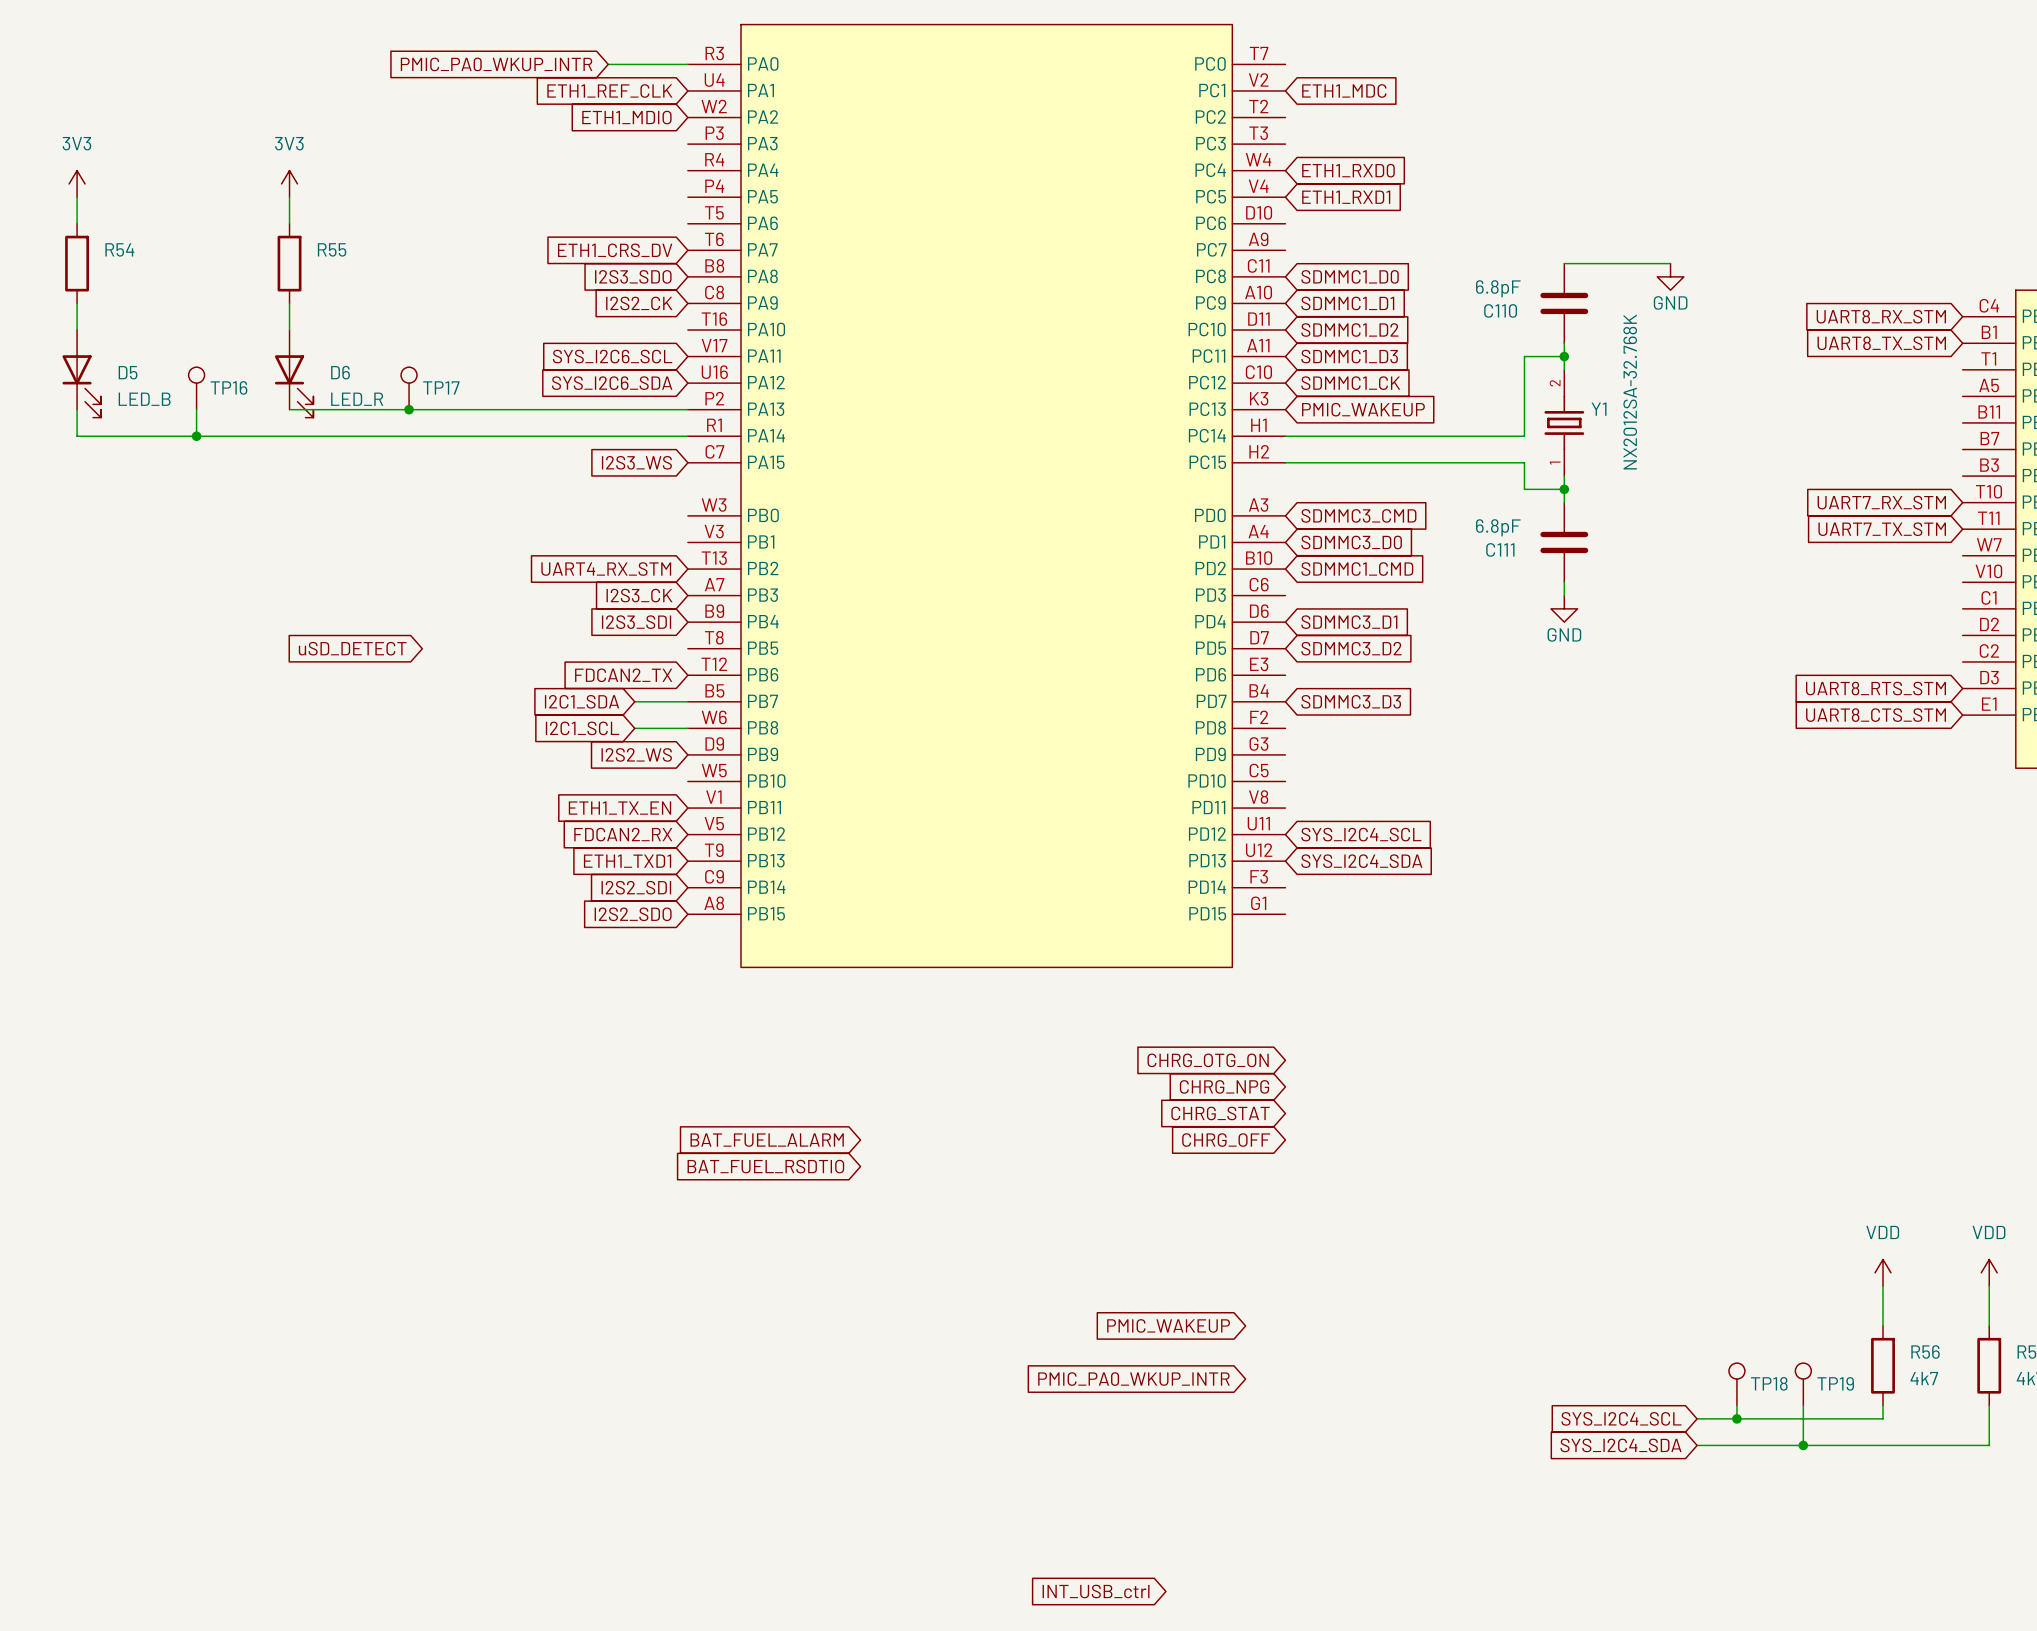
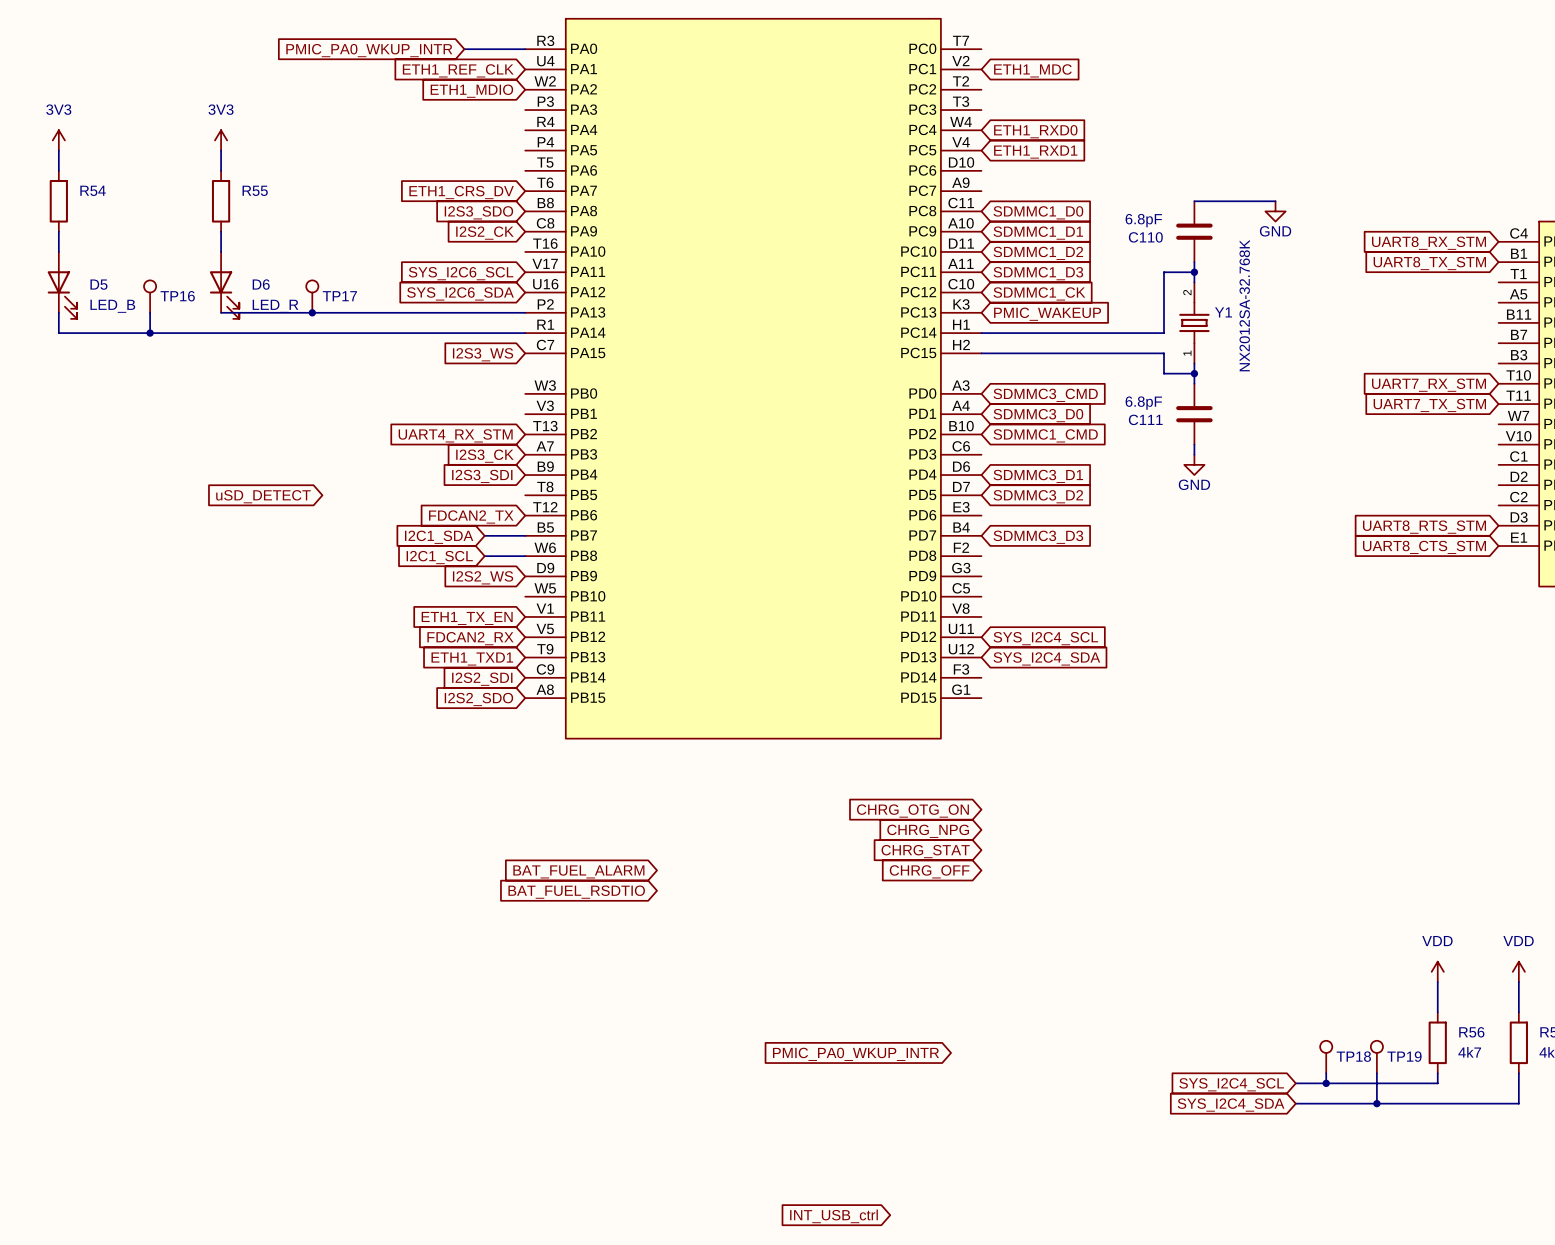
global label: PMIC_WAKEUP (1168, 1325) -> none

